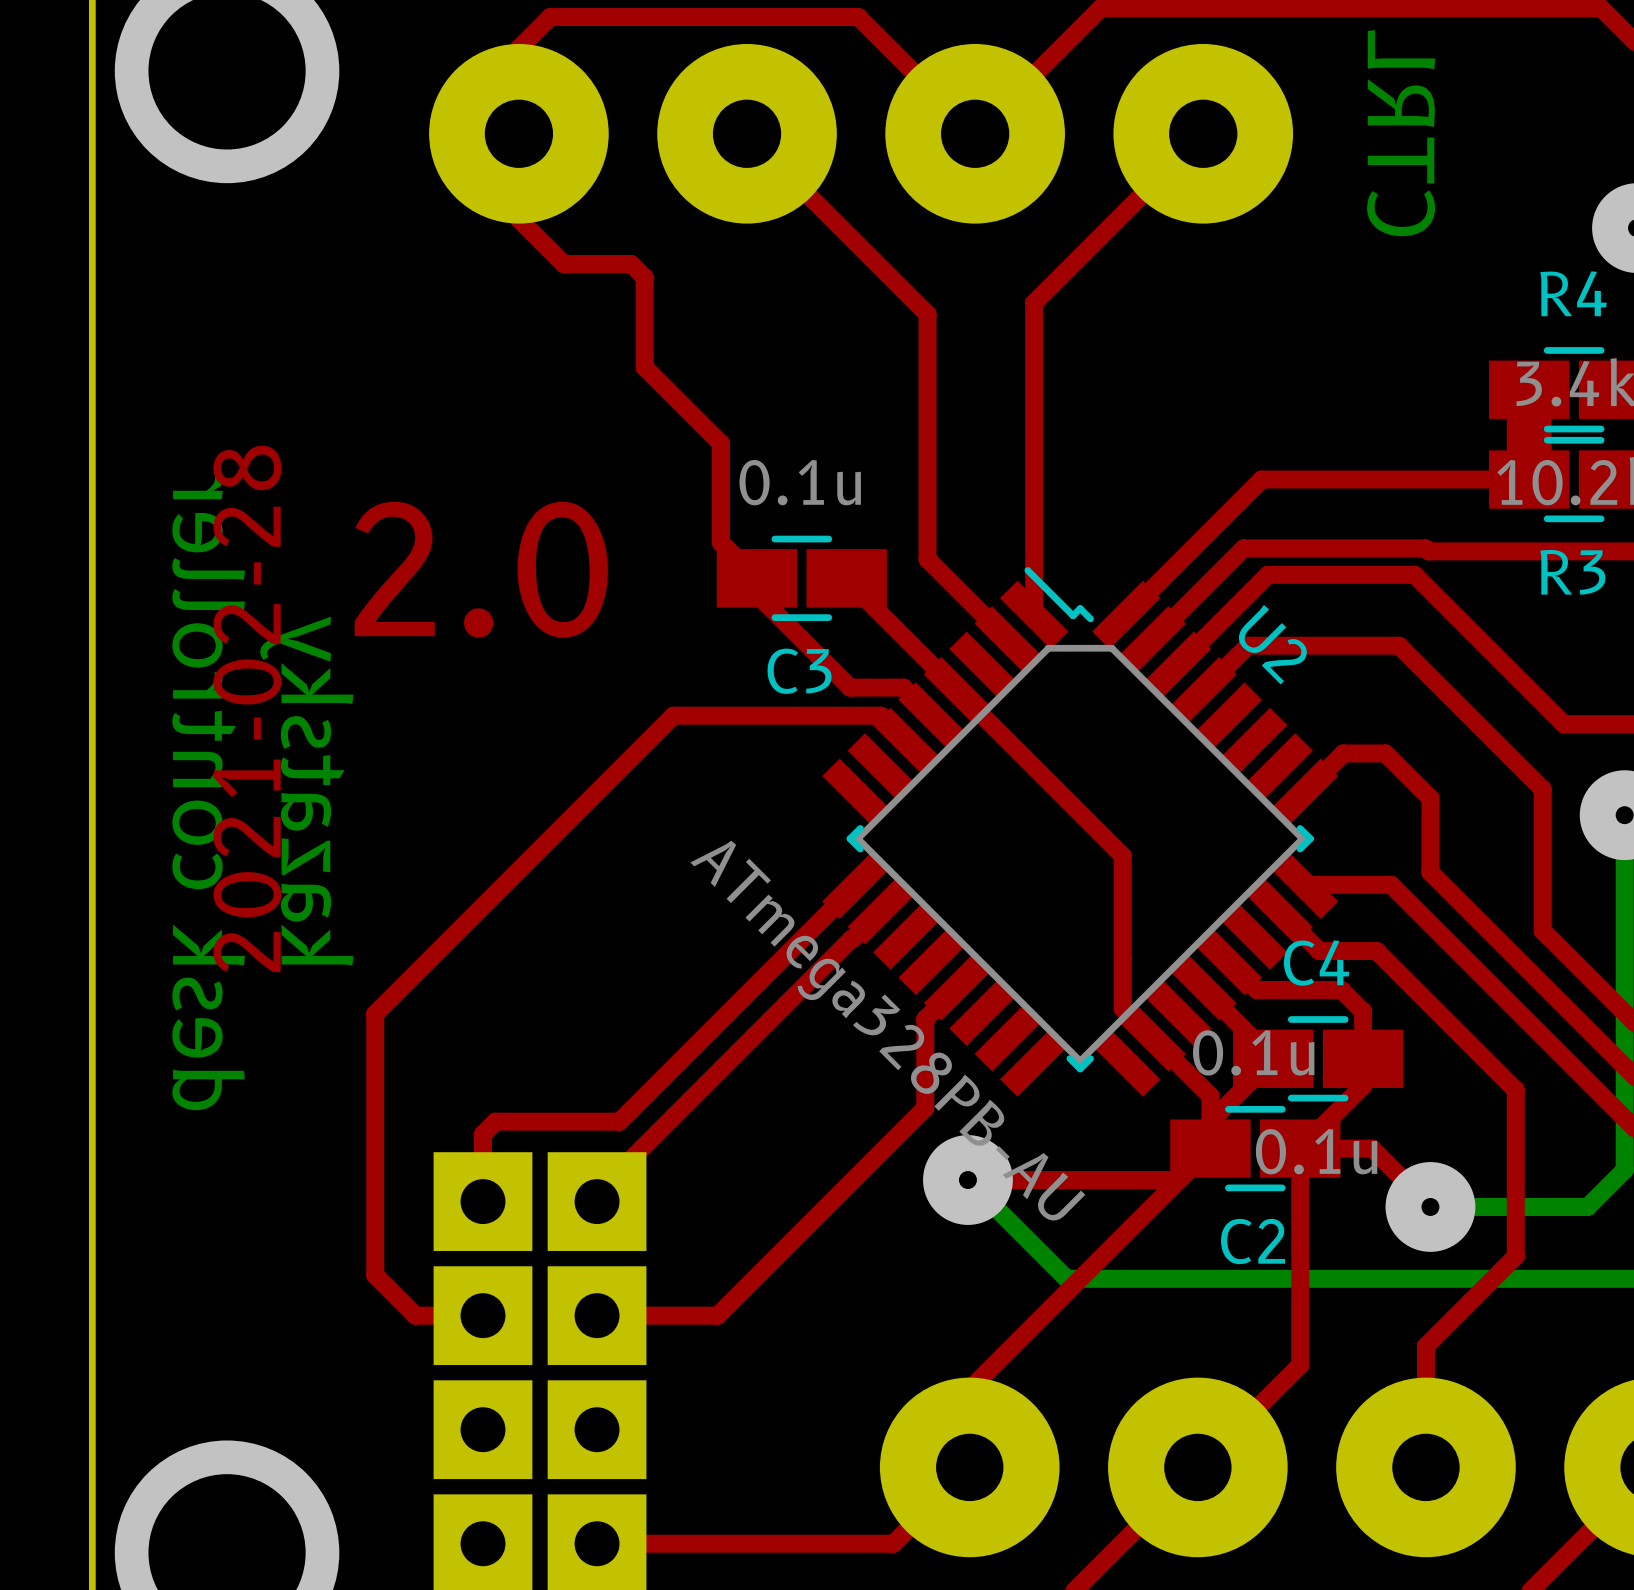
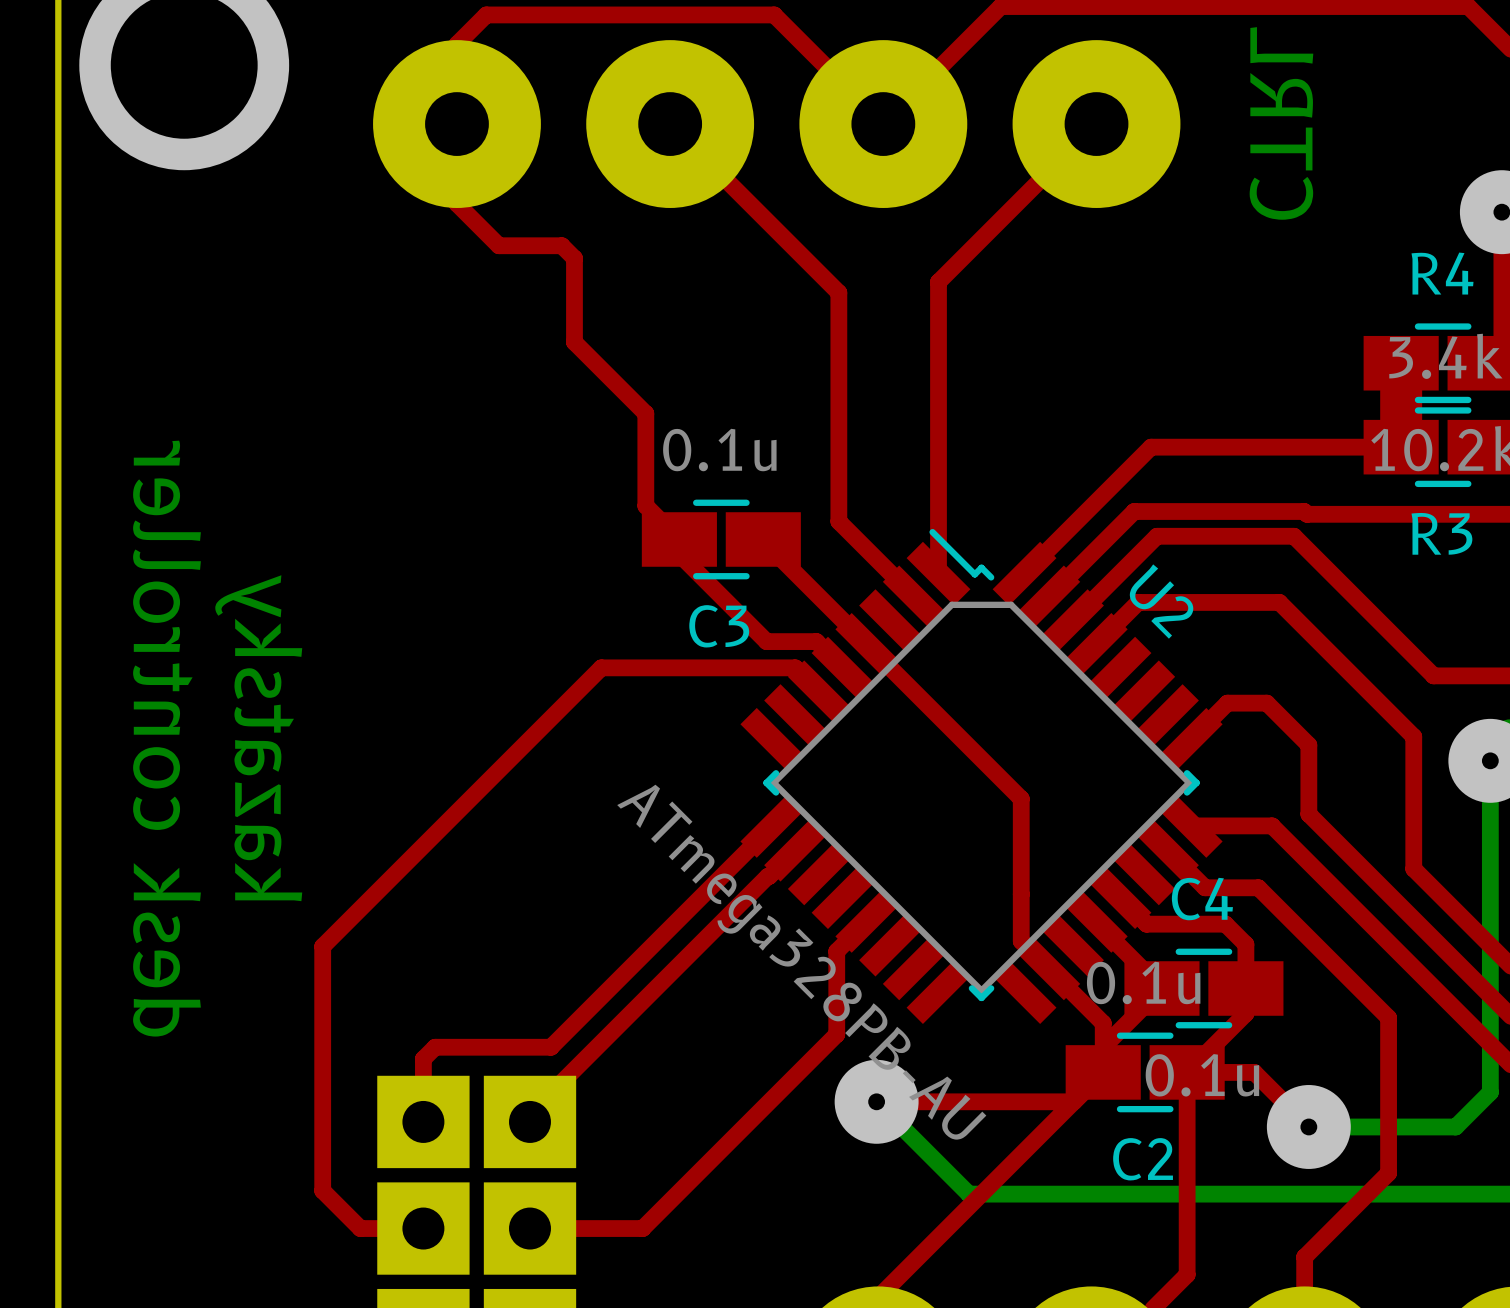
text: 2.0 (481, 569) -> none
text: 2021-02-28 (247, 708) -> none

